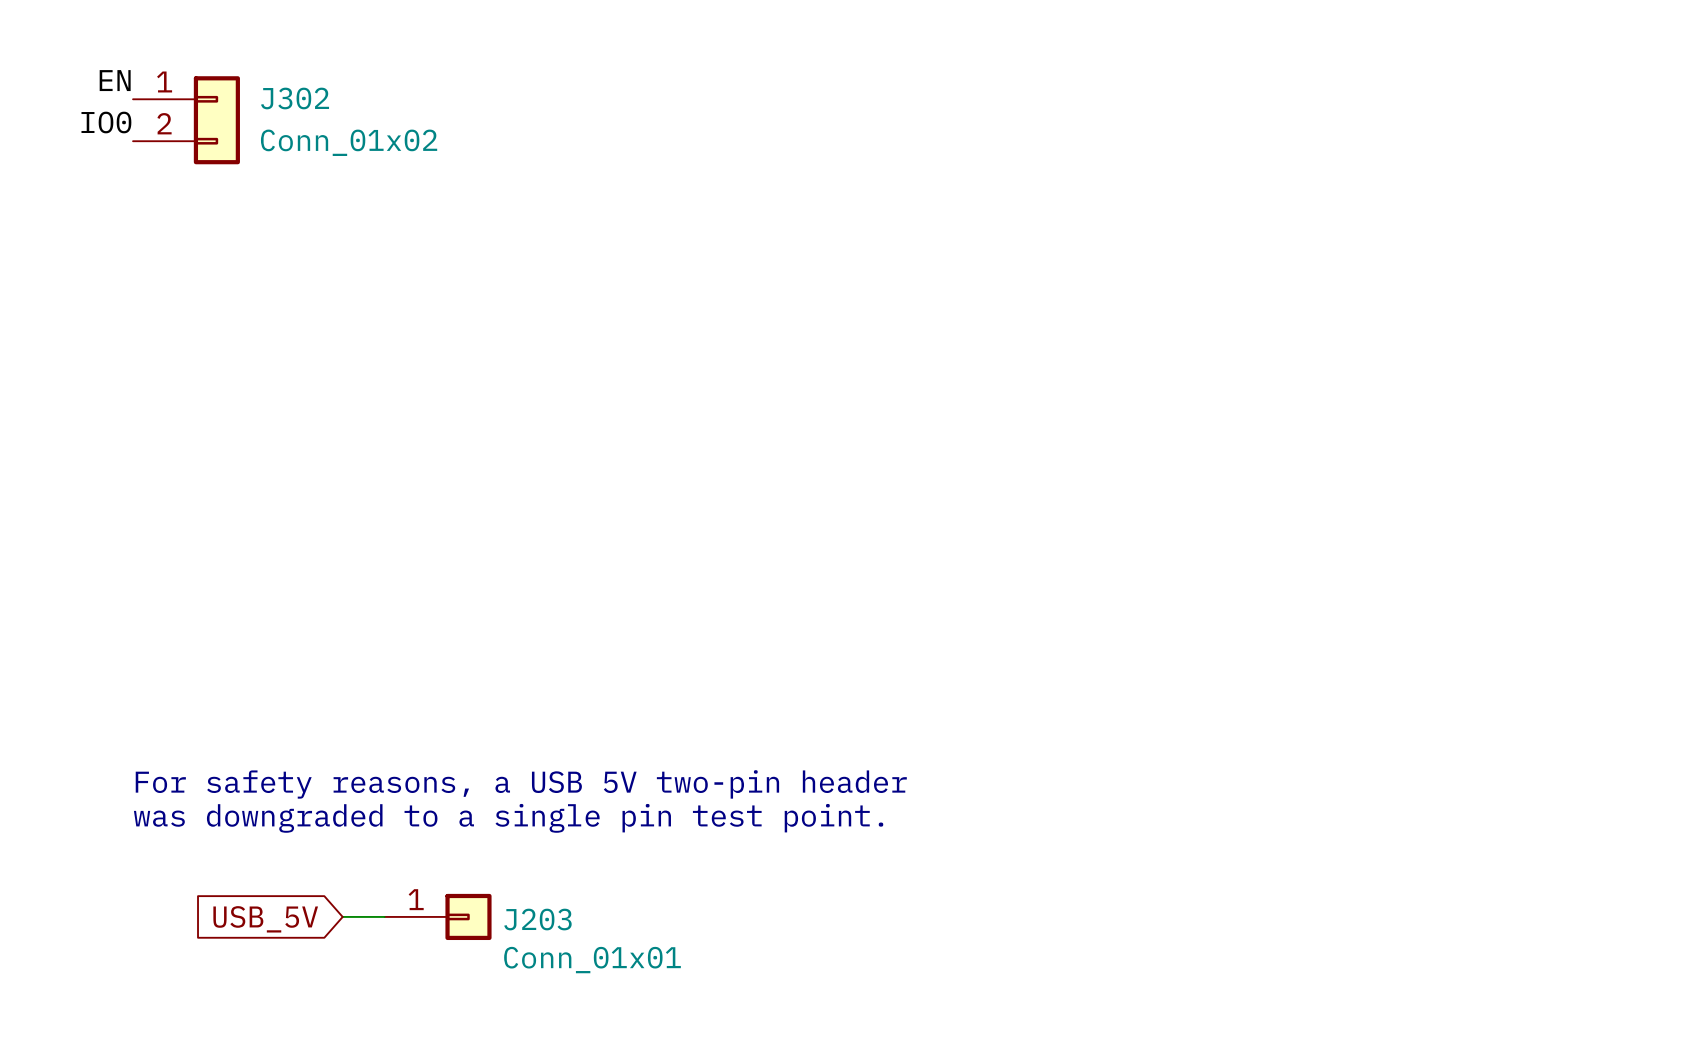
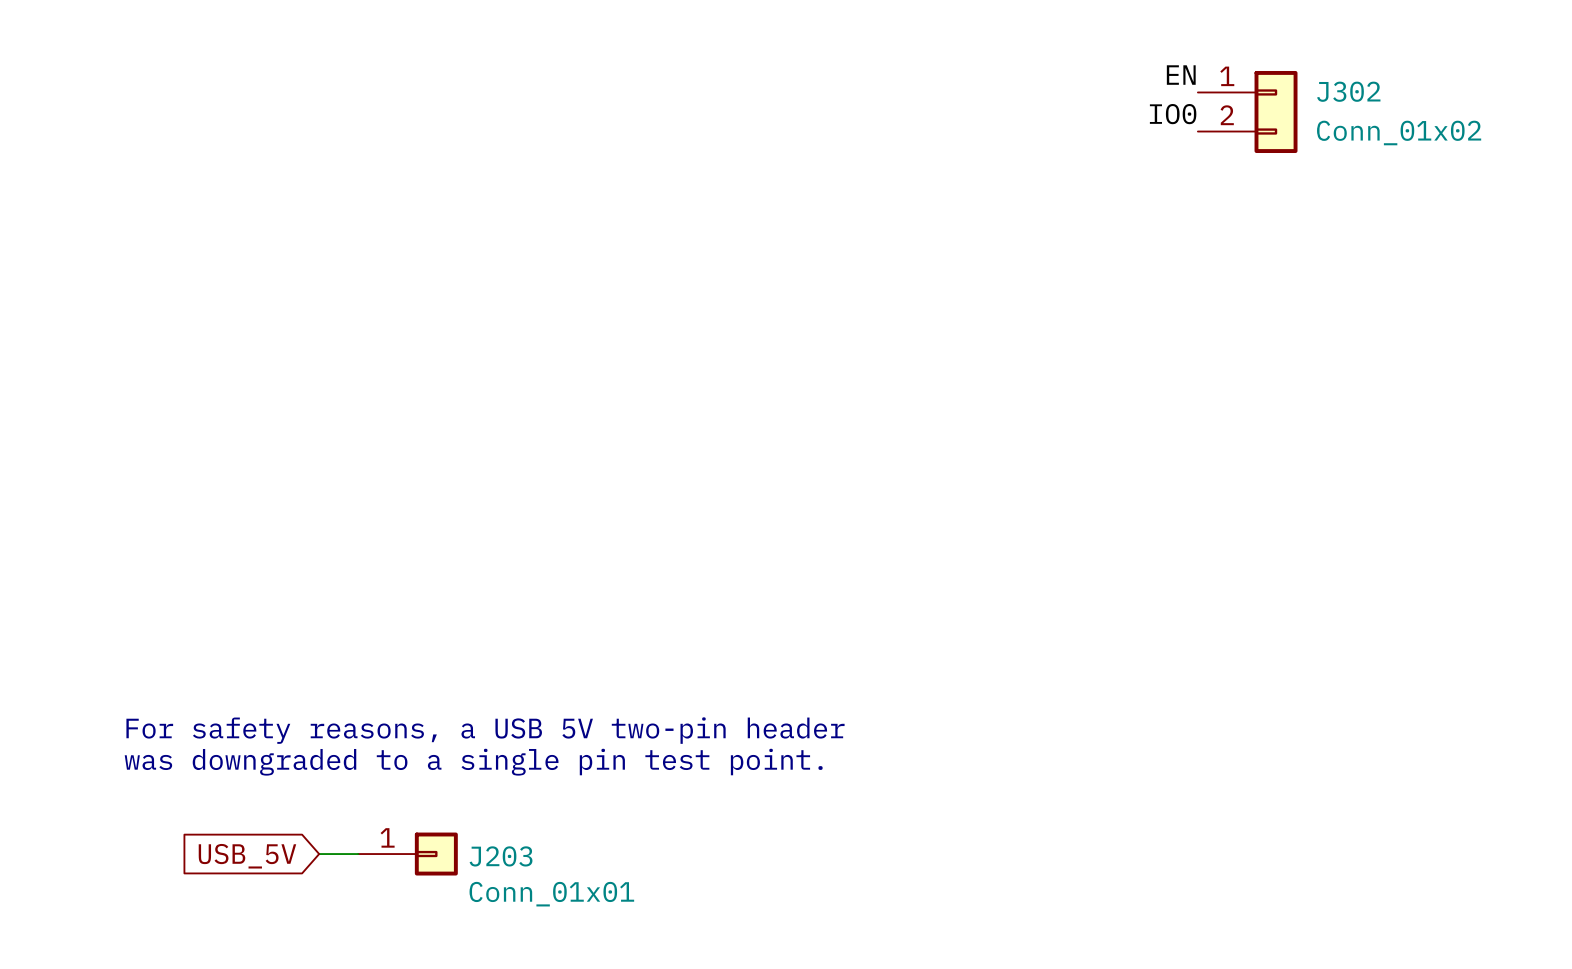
label: EN (115, 80) -> none
label: none -> EN (1181, 75)
J302 position: (186, 120) -> (1247, 111)
label: IO0 (106, 122) -> none
label: none -> IO0 (1173, 114)

